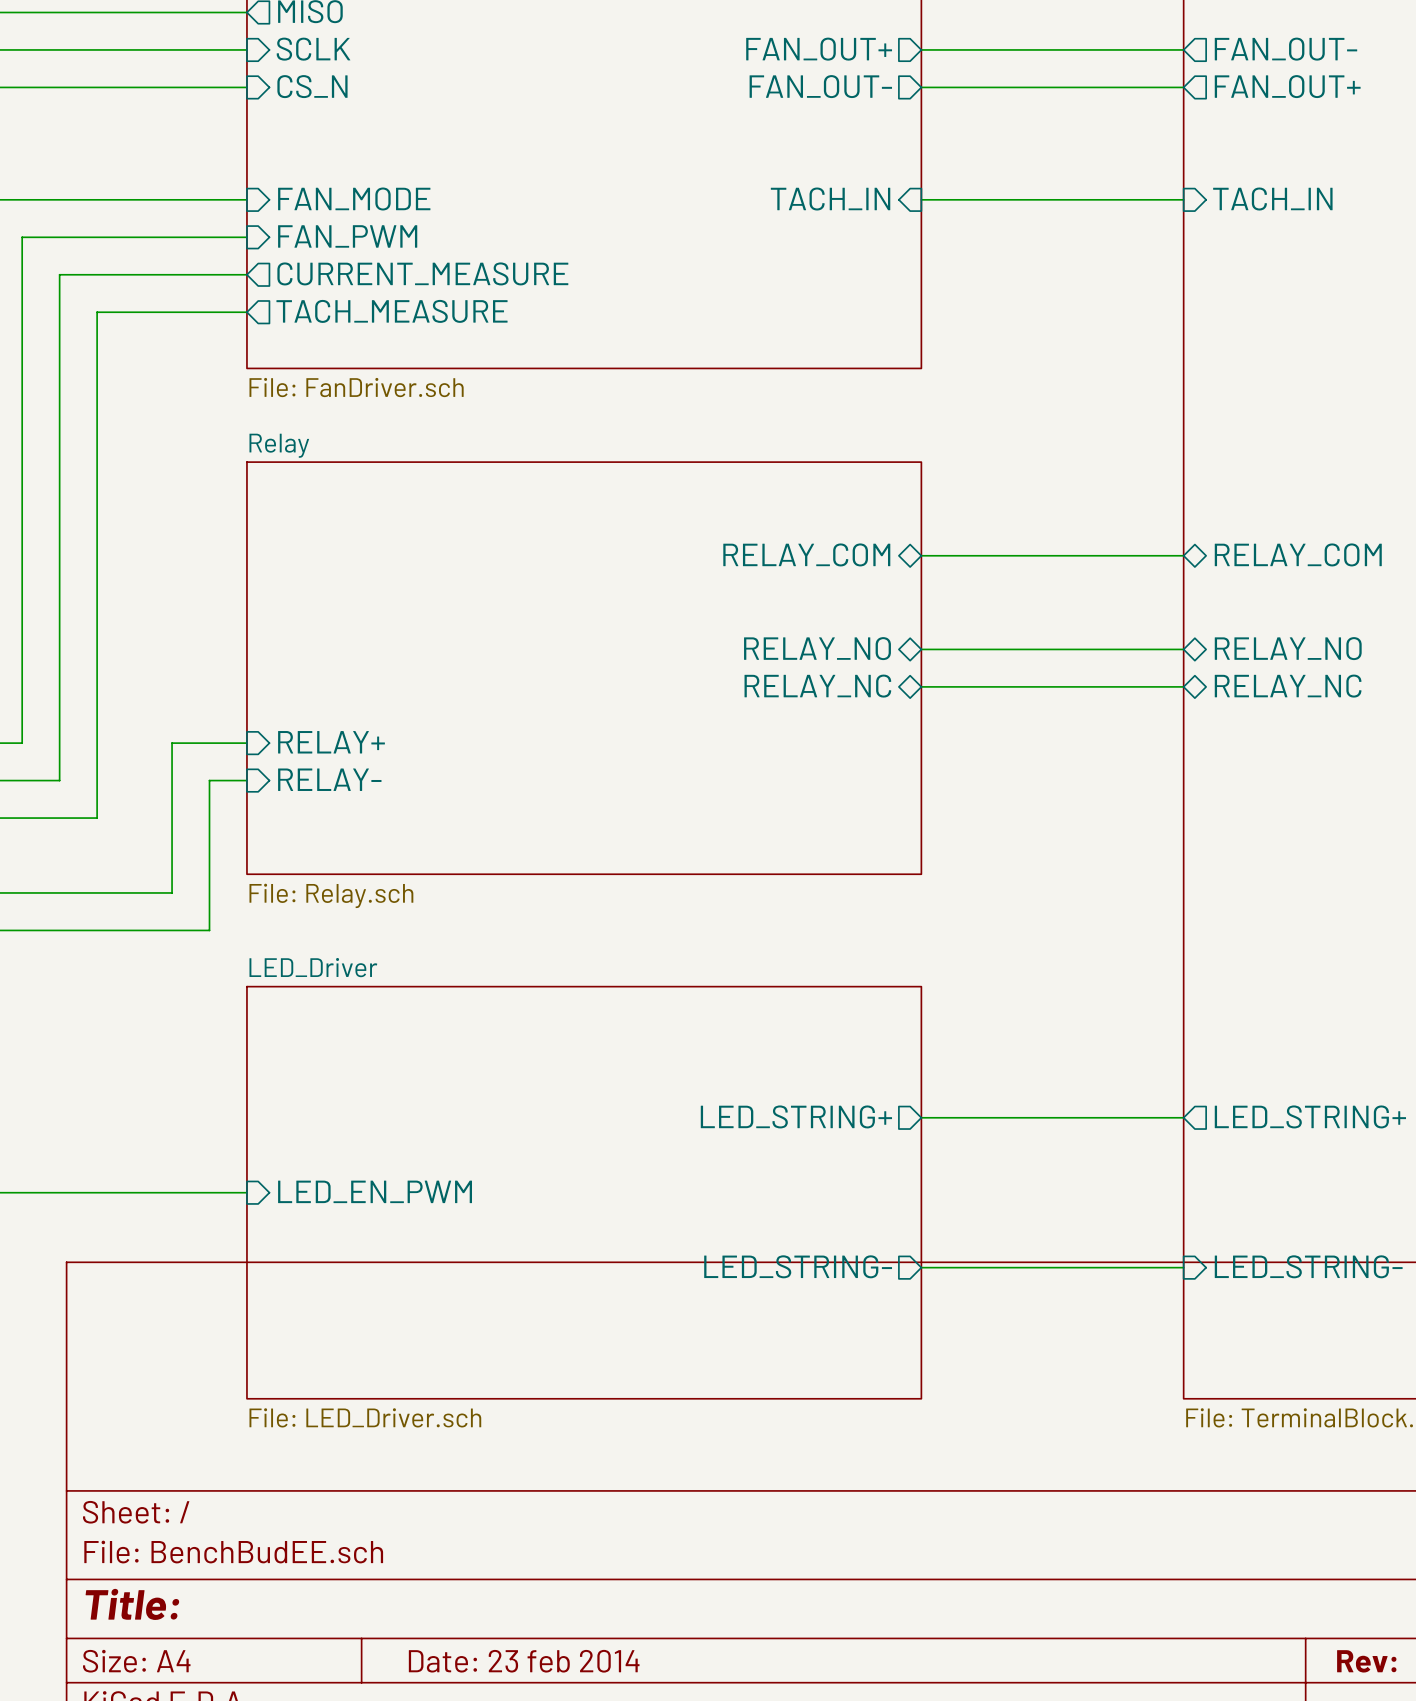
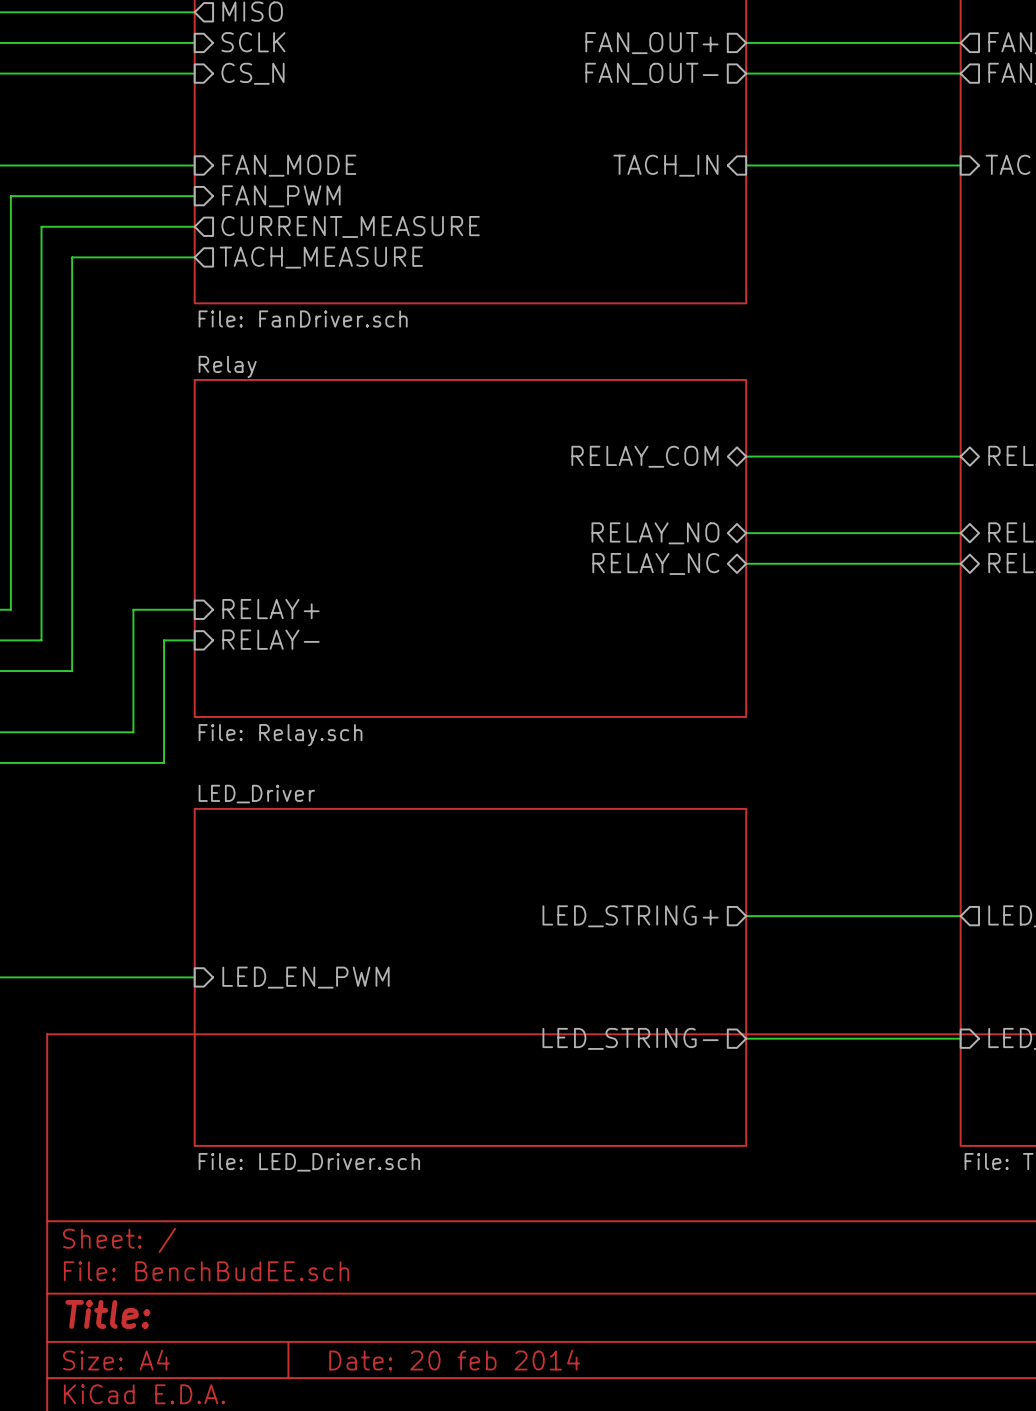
title block: Date: 23 feb 2014 (524, 1661) -> Date: 20 feb 2014 (454, 1360)

